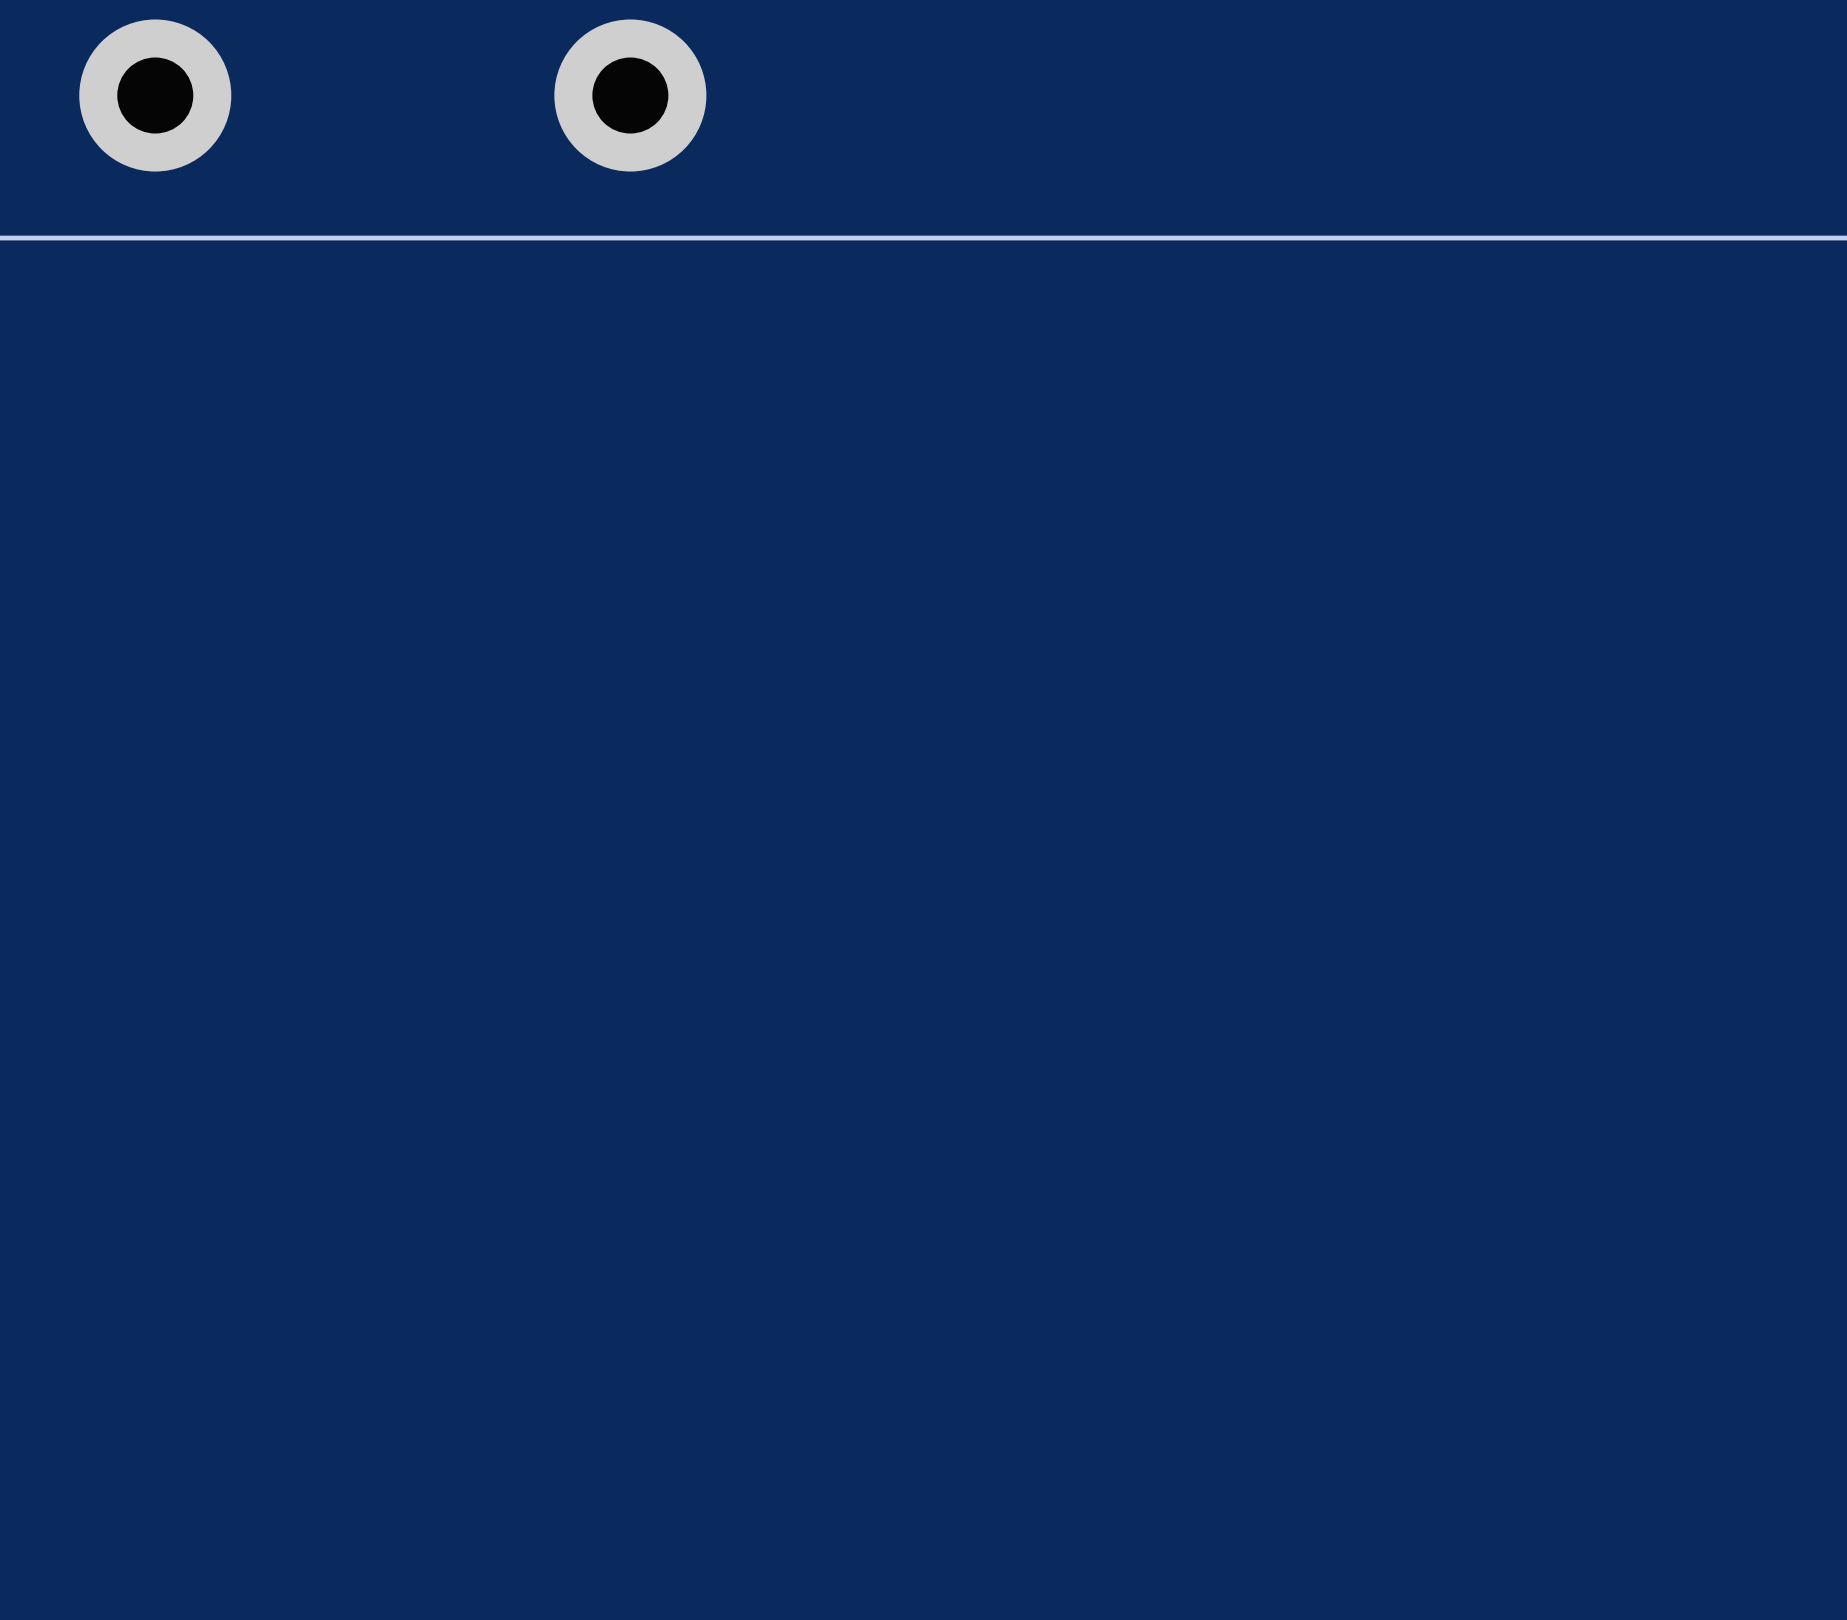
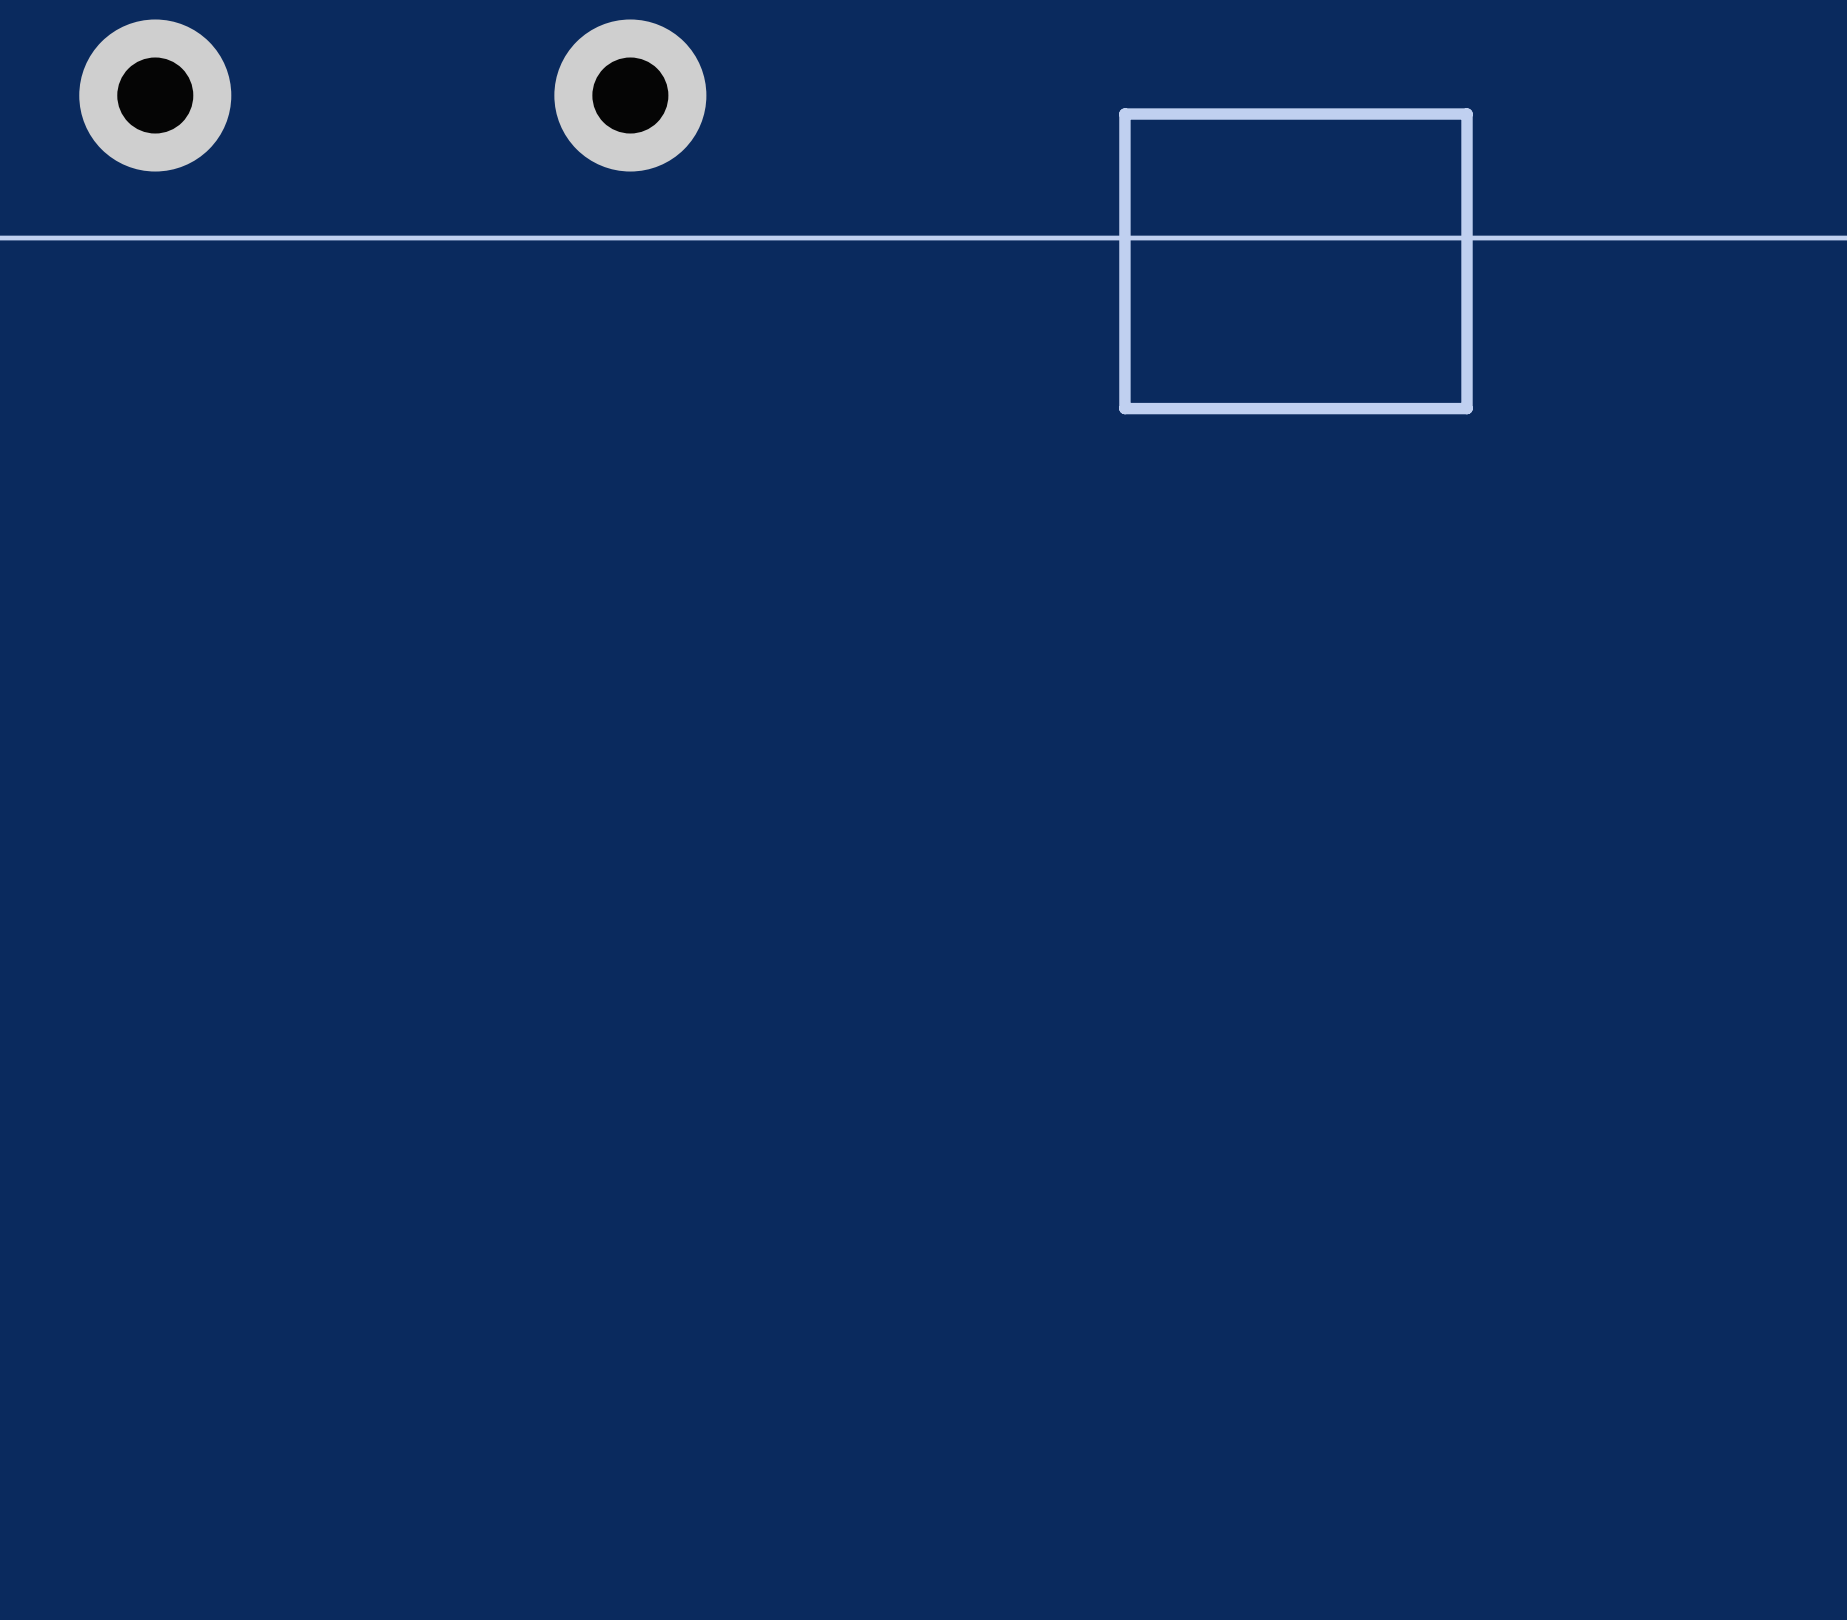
part: none -> (1295, 261)

